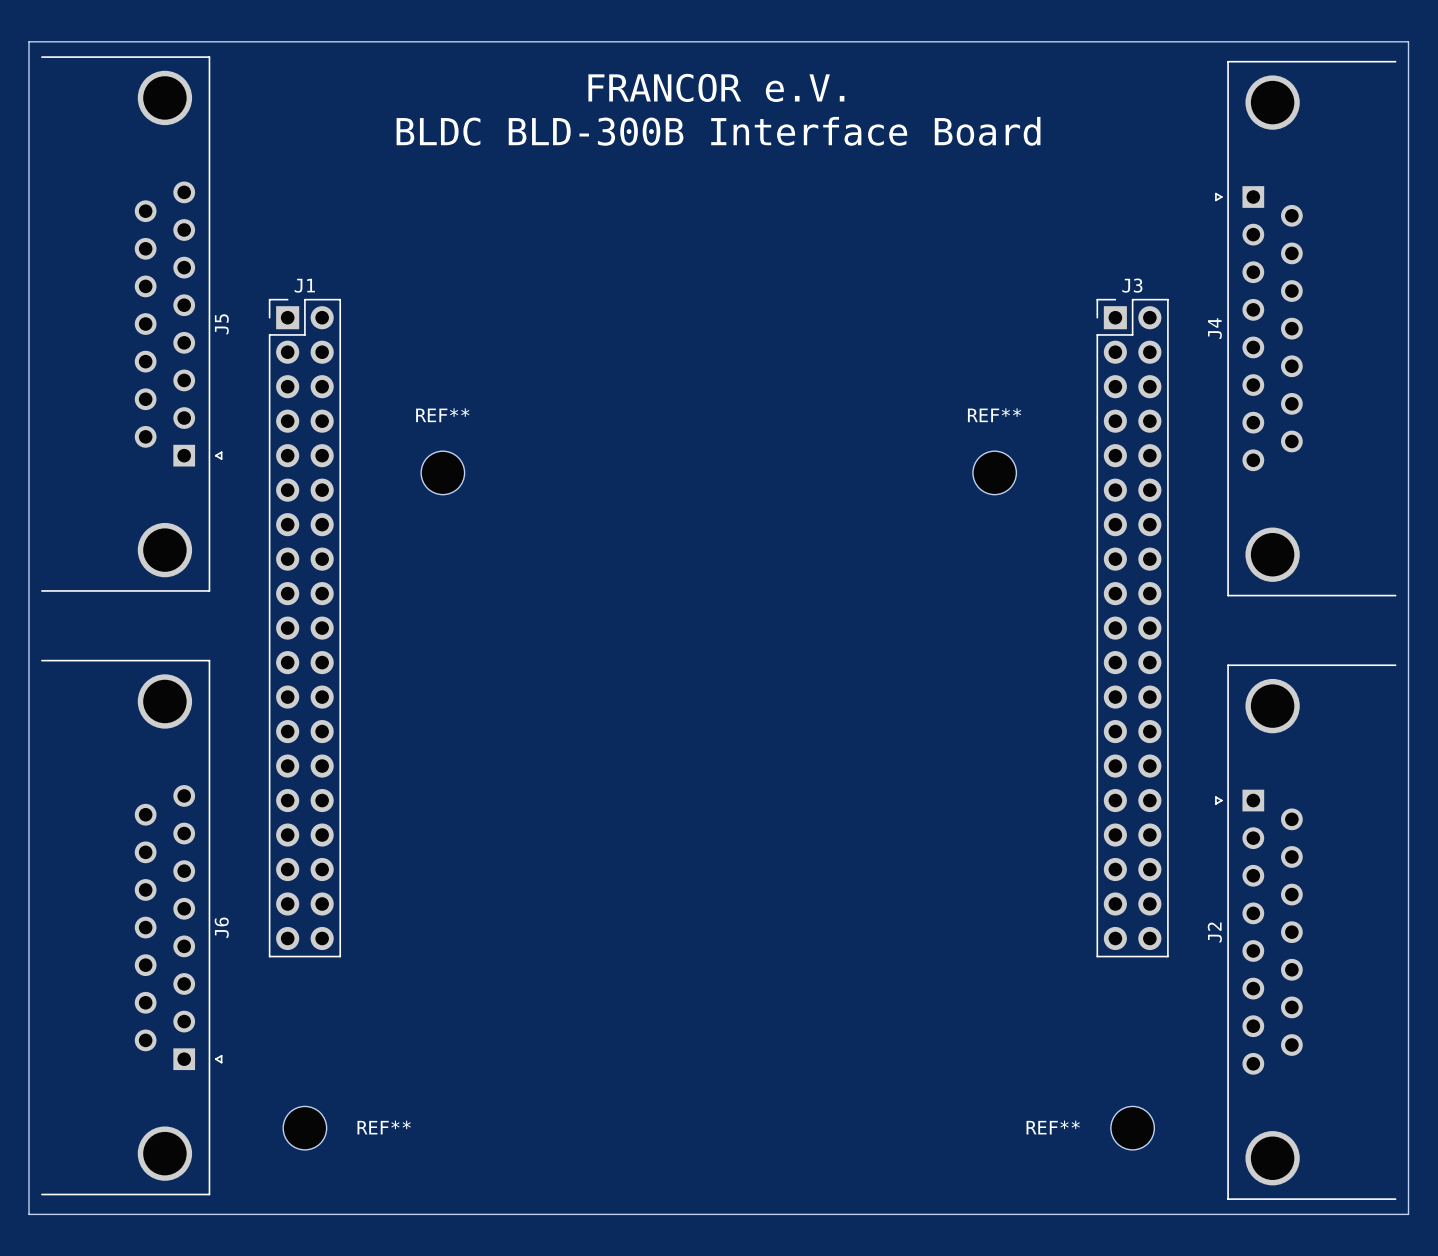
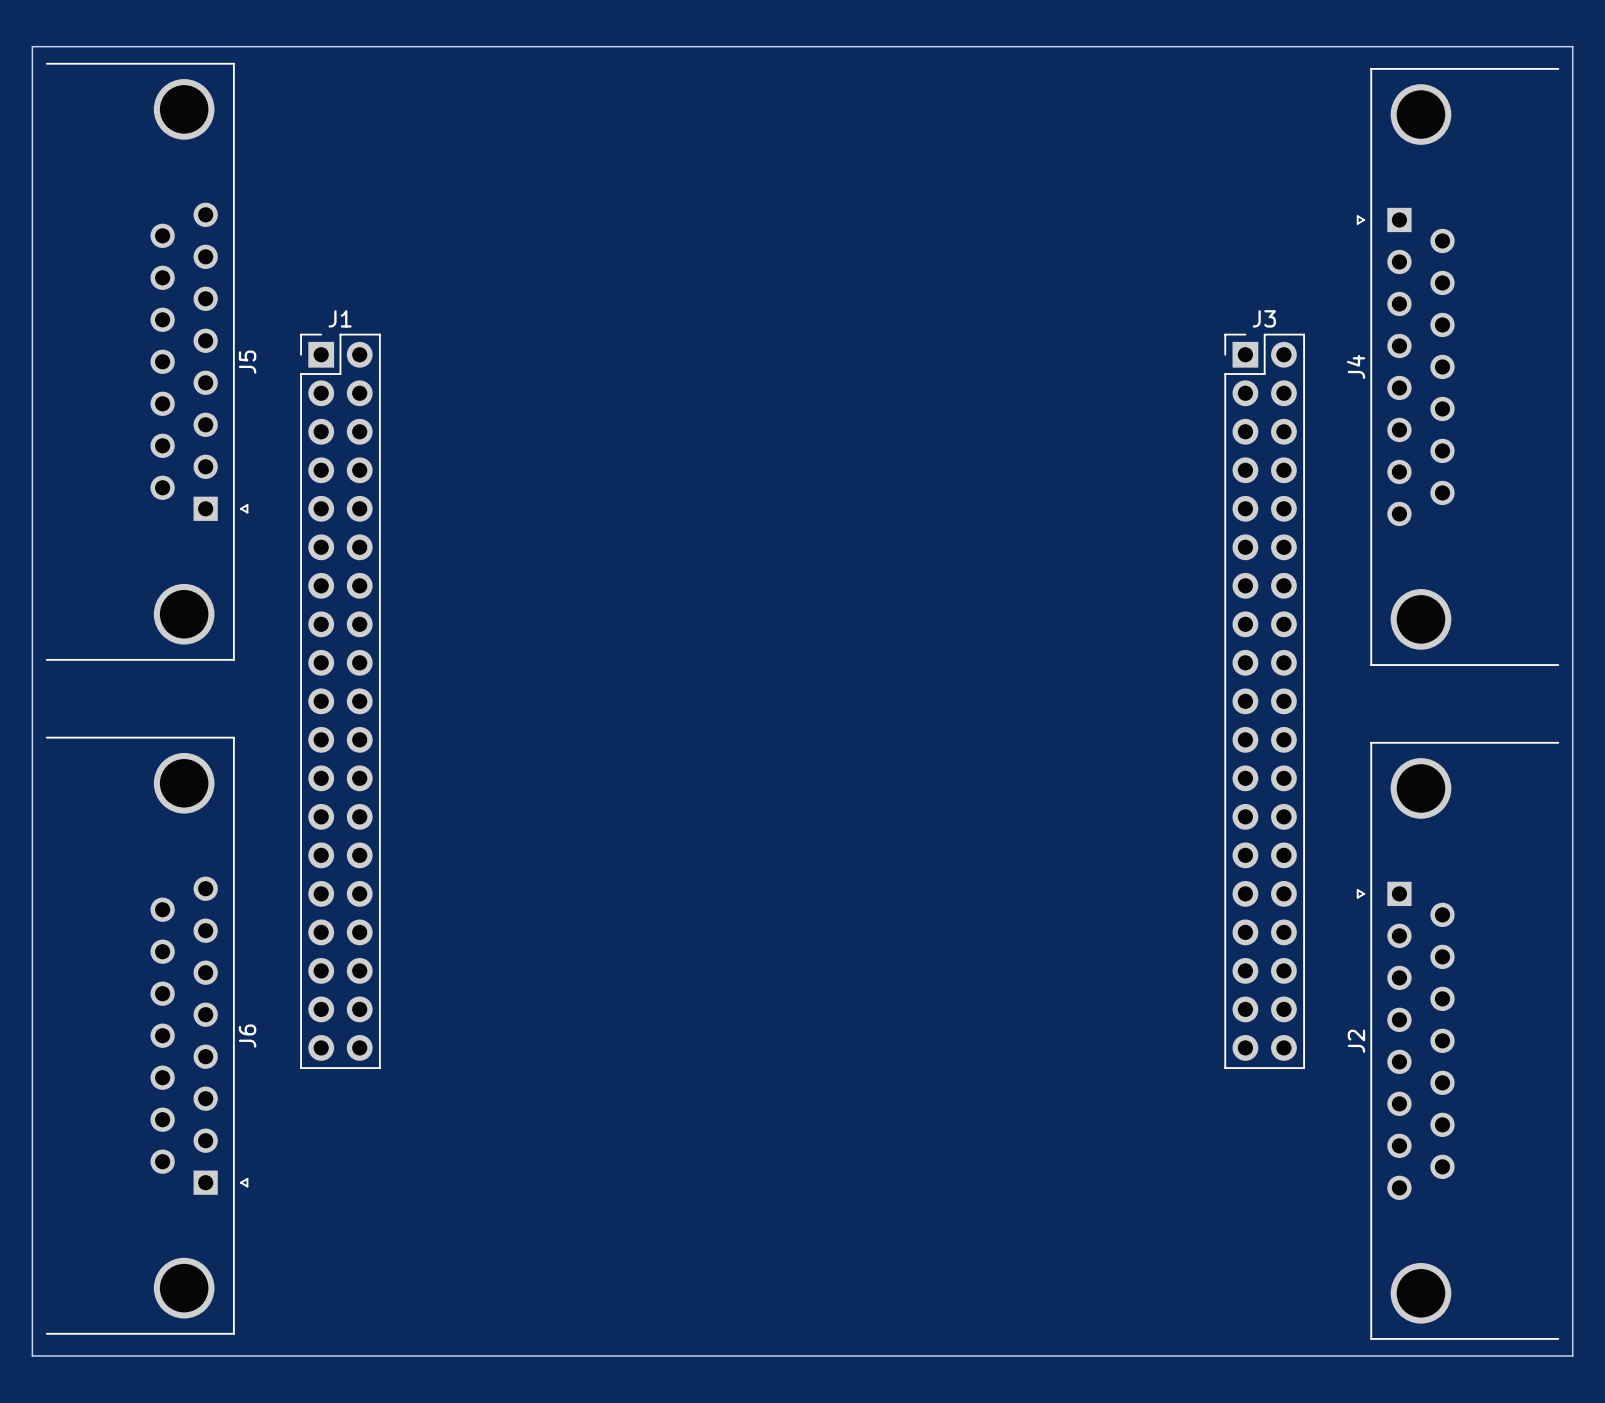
text: FRANCOR e.V. (716, 87) -> none
text: BLDC BLD-300B Interface Board (718, 131) -> none
REF**: (442, 472) -> none
REF**: (994, 472) -> none
REF**: (304, 1128) -> none
REF**: (1132, 1128) -> none

